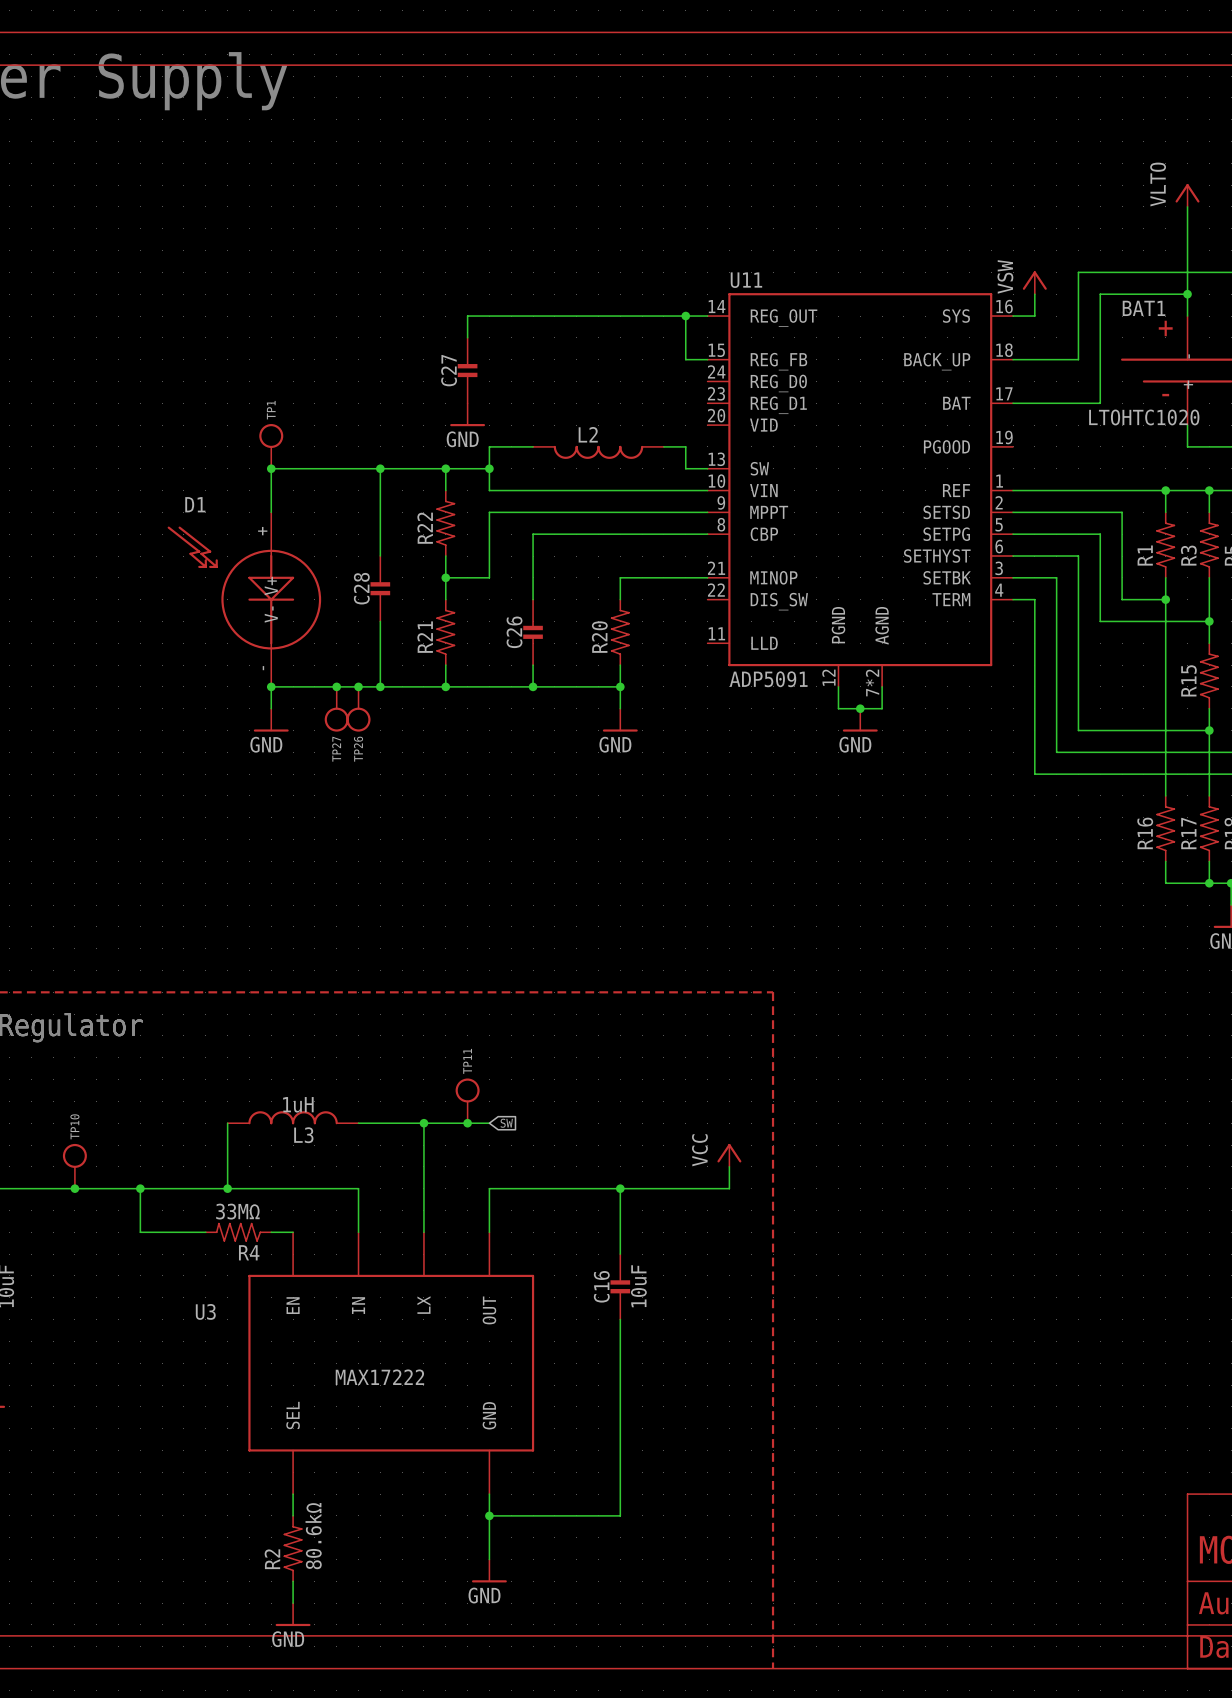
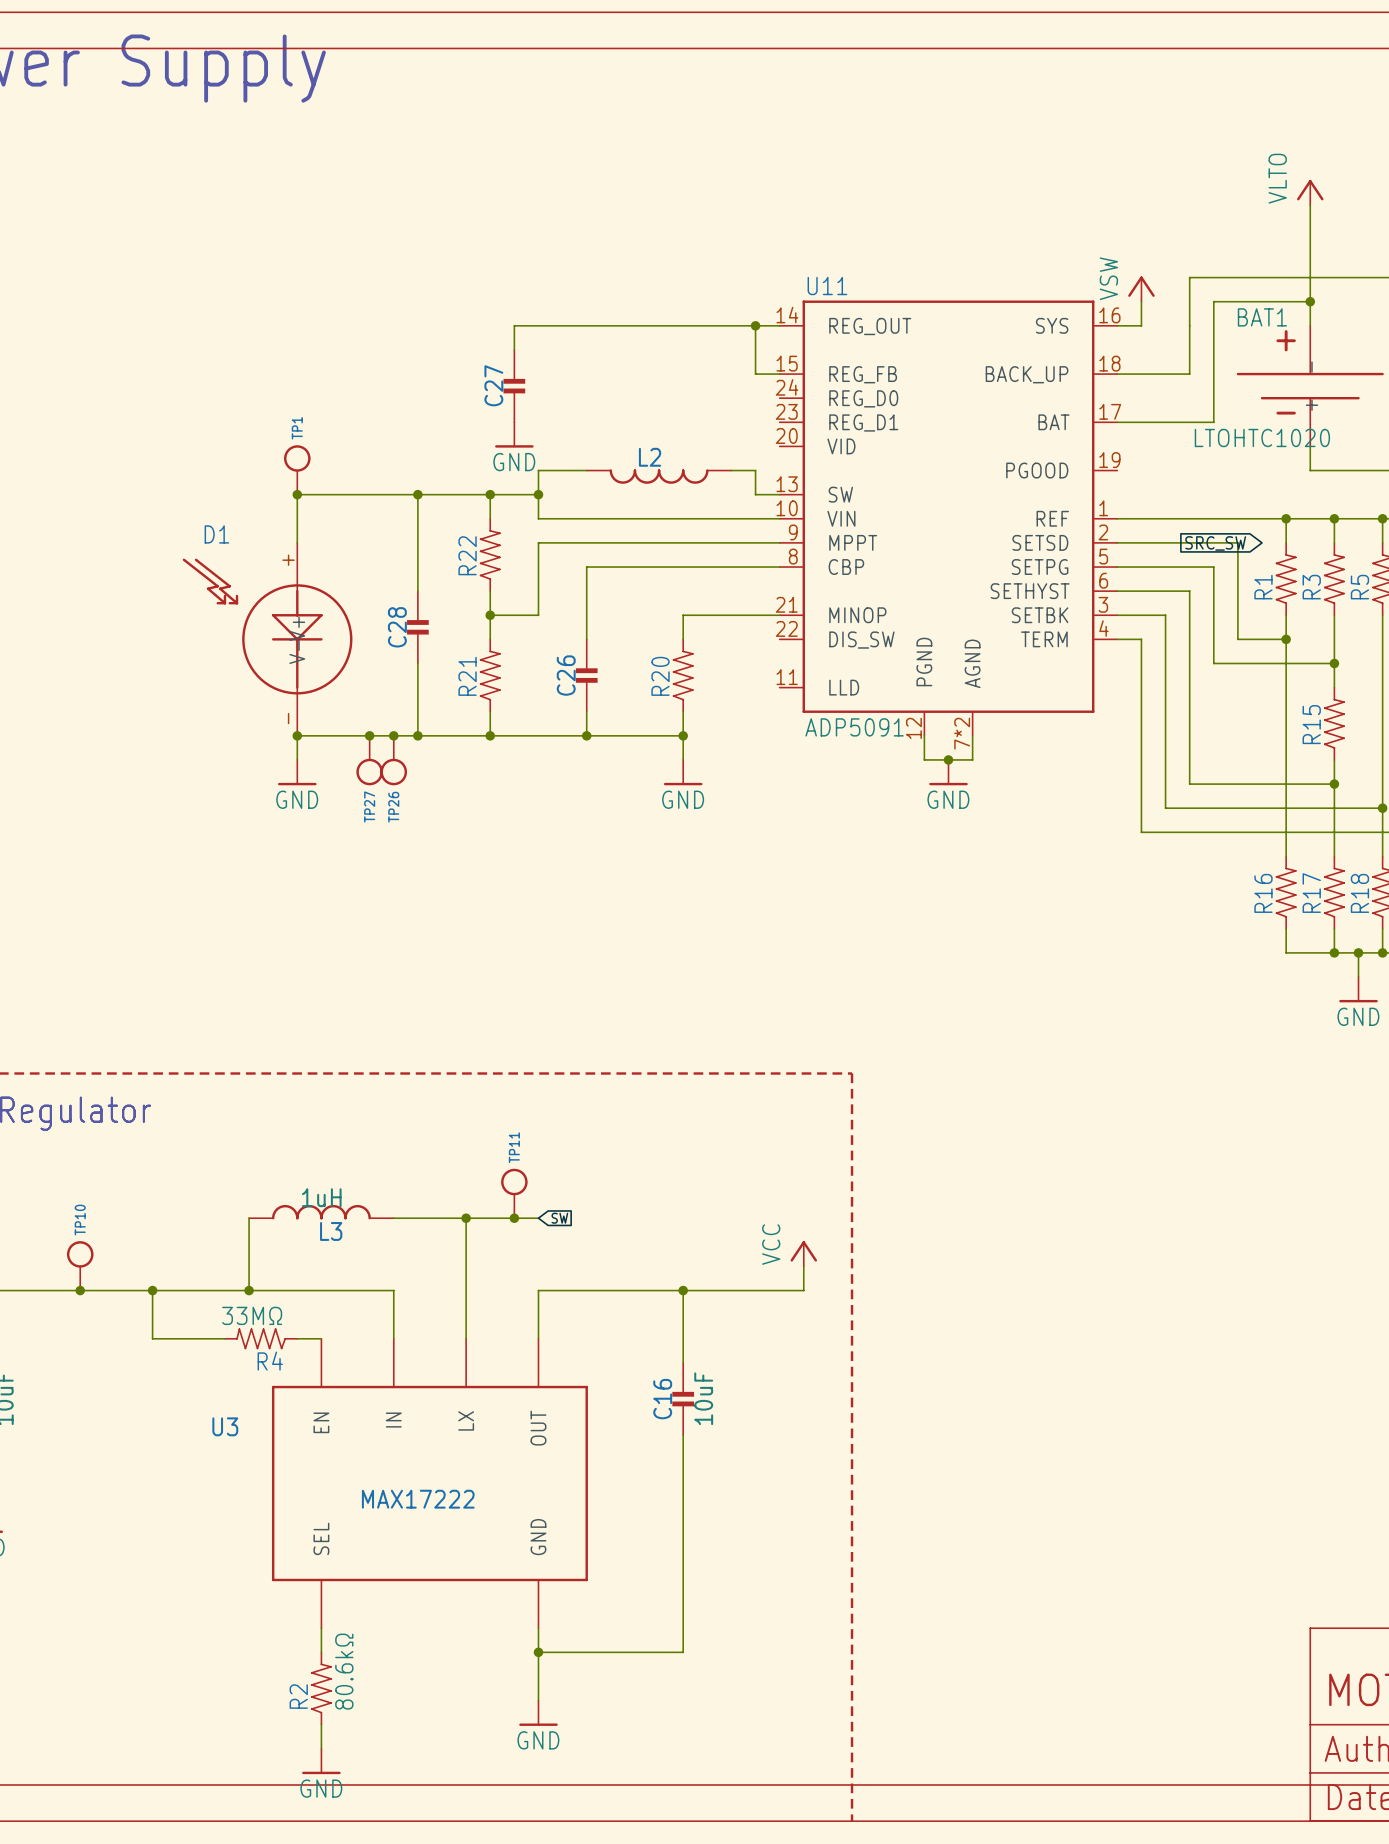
global label: none -> SRC_SW (1215, 543)

